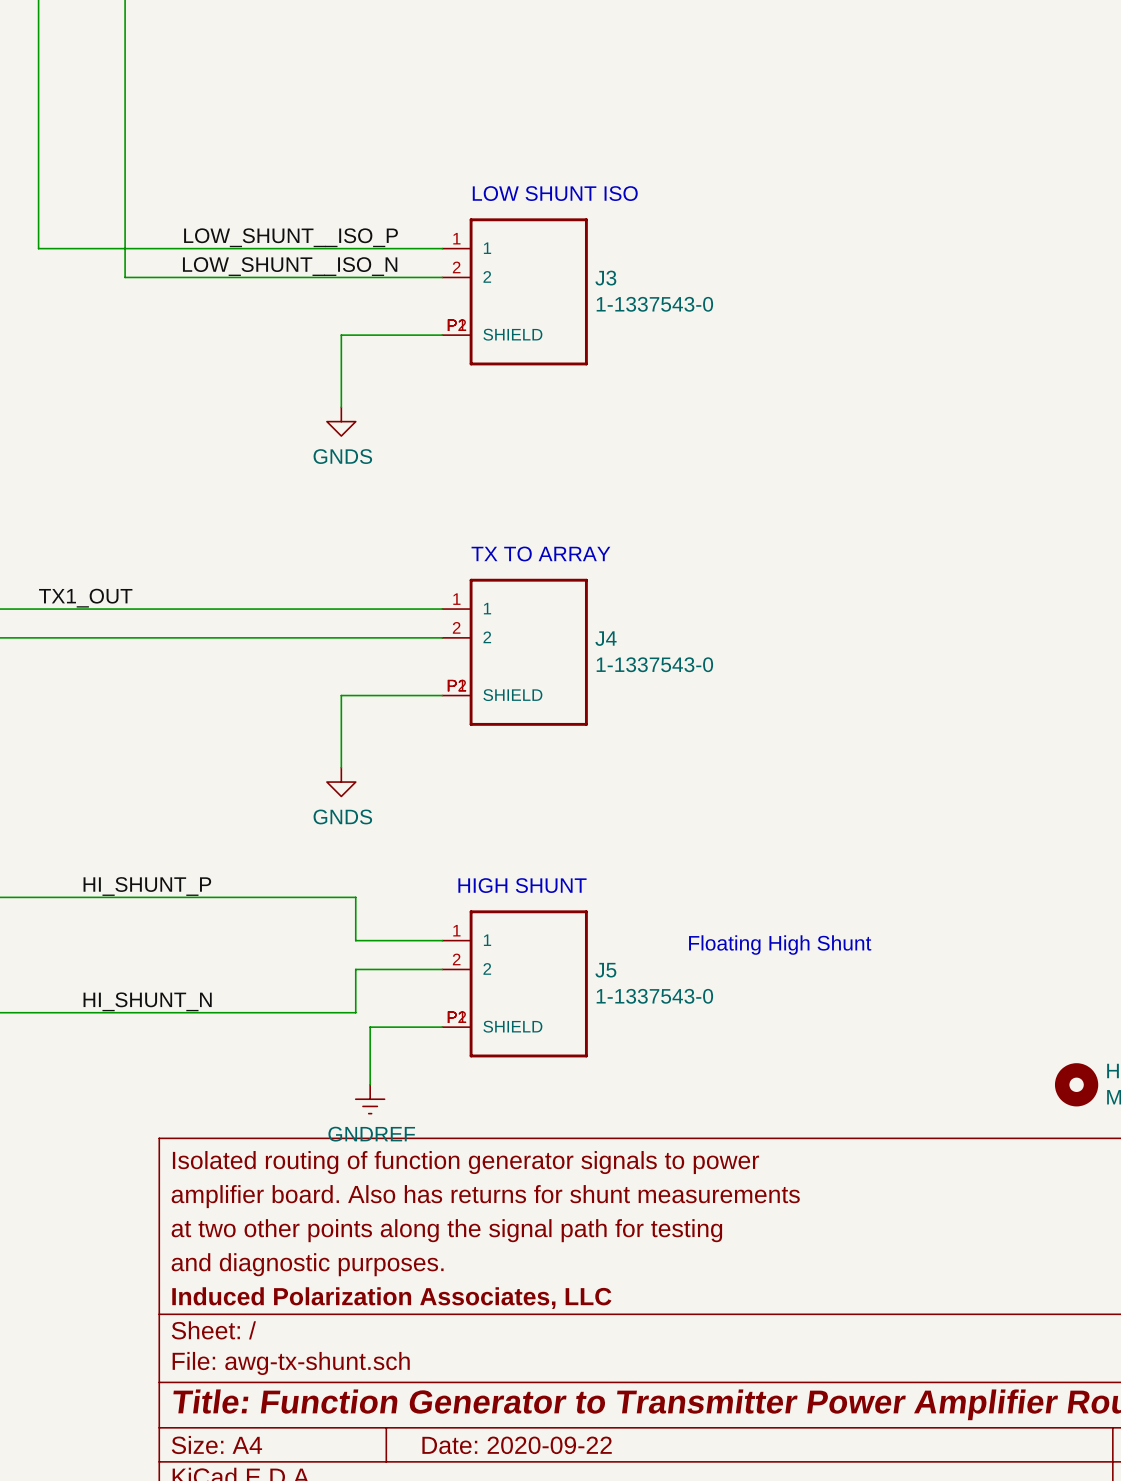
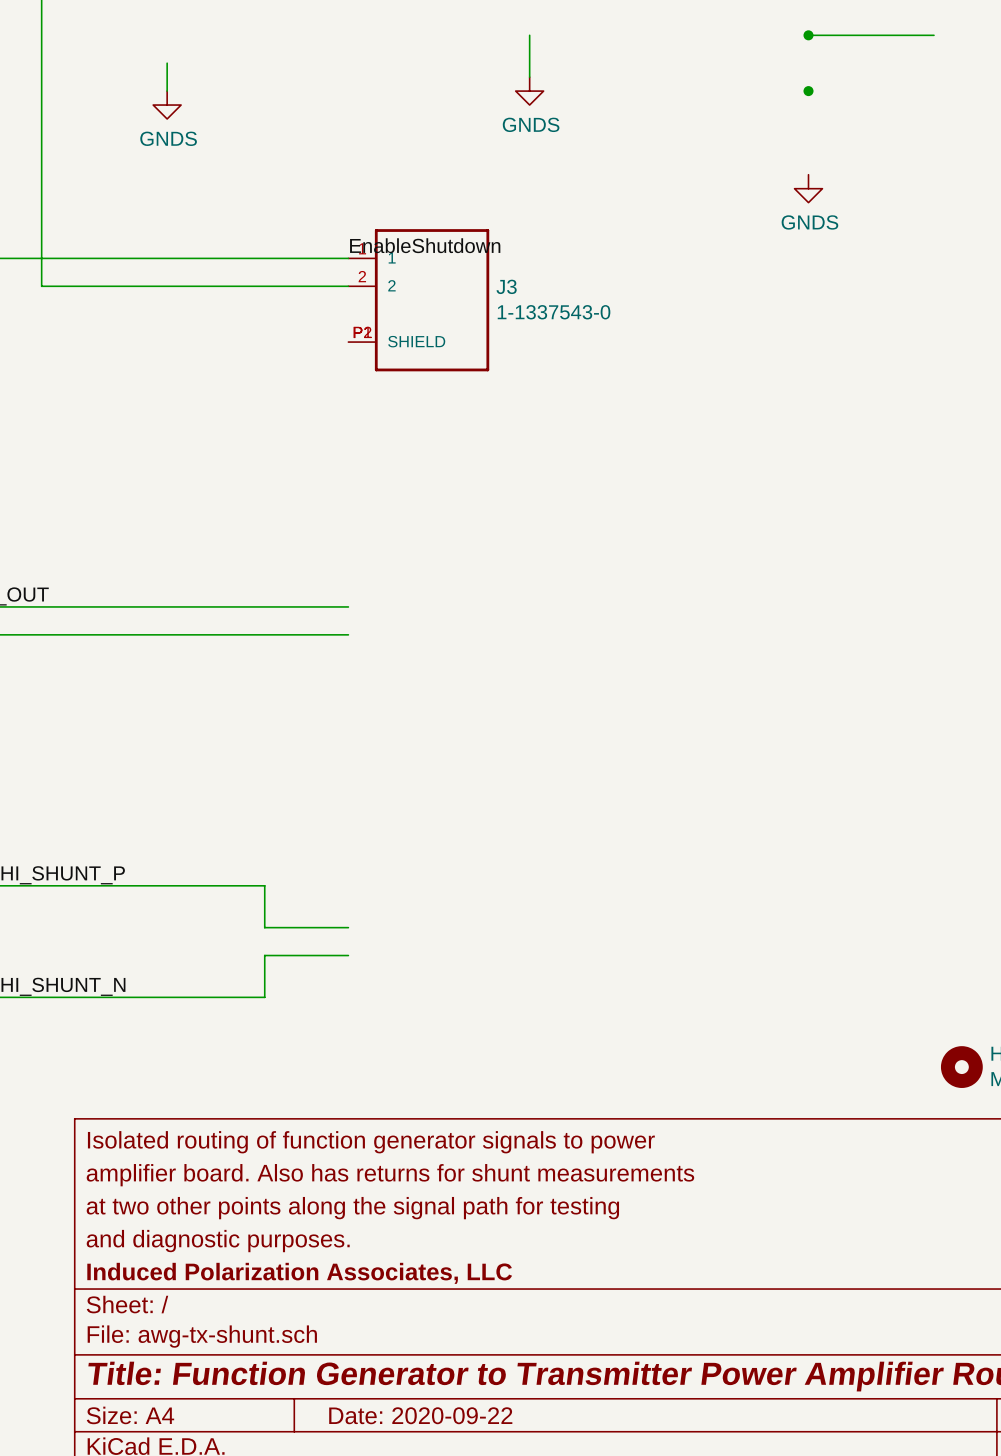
wire: none -> (529, 35) (529, 77)
wire: none -> (808, 35) (933, 35)
junction: none -> (808, 35)
wire: none -> (167, 63) (167, 91)
power symbol: none -> GNDS (529, 91)
junction: none -> (808, 91)
power symbol: none -> GNDS (167, 105)
power symbol: none -> GNDS (808, 188)
text: LOW SHUNT ISO (555, 193) -> none
label: none -> EnableShutdown (425, 245)
label: LOW_SHUNT__ISO_P (291, 237) -> none
label: LOW_SHUNT__ISO_N (290, 266) -> none
wire: (442, 335) (341, 335) (341, 407) -> none
power symbol: GNDS (341, 421) -> none
text: TX TO ARRAY (540, 553) -> none
J4: 1-1337543-0 (515, 652) -> none
wire: (442, 695) (341, 695) (341, 767) -> none
power symbol: GNDS (341, 782) -> none
text: HIGH SHUNT (522, 885) -> none
text: Floating High Shunt (780, 945) -> none
J5: 1-1337543-0 (515, 983) -> none
wire: (442, 1027) (370, 1027) (370, 1084) -> none
power symbol: GNDREF (370, 1099) -> none

